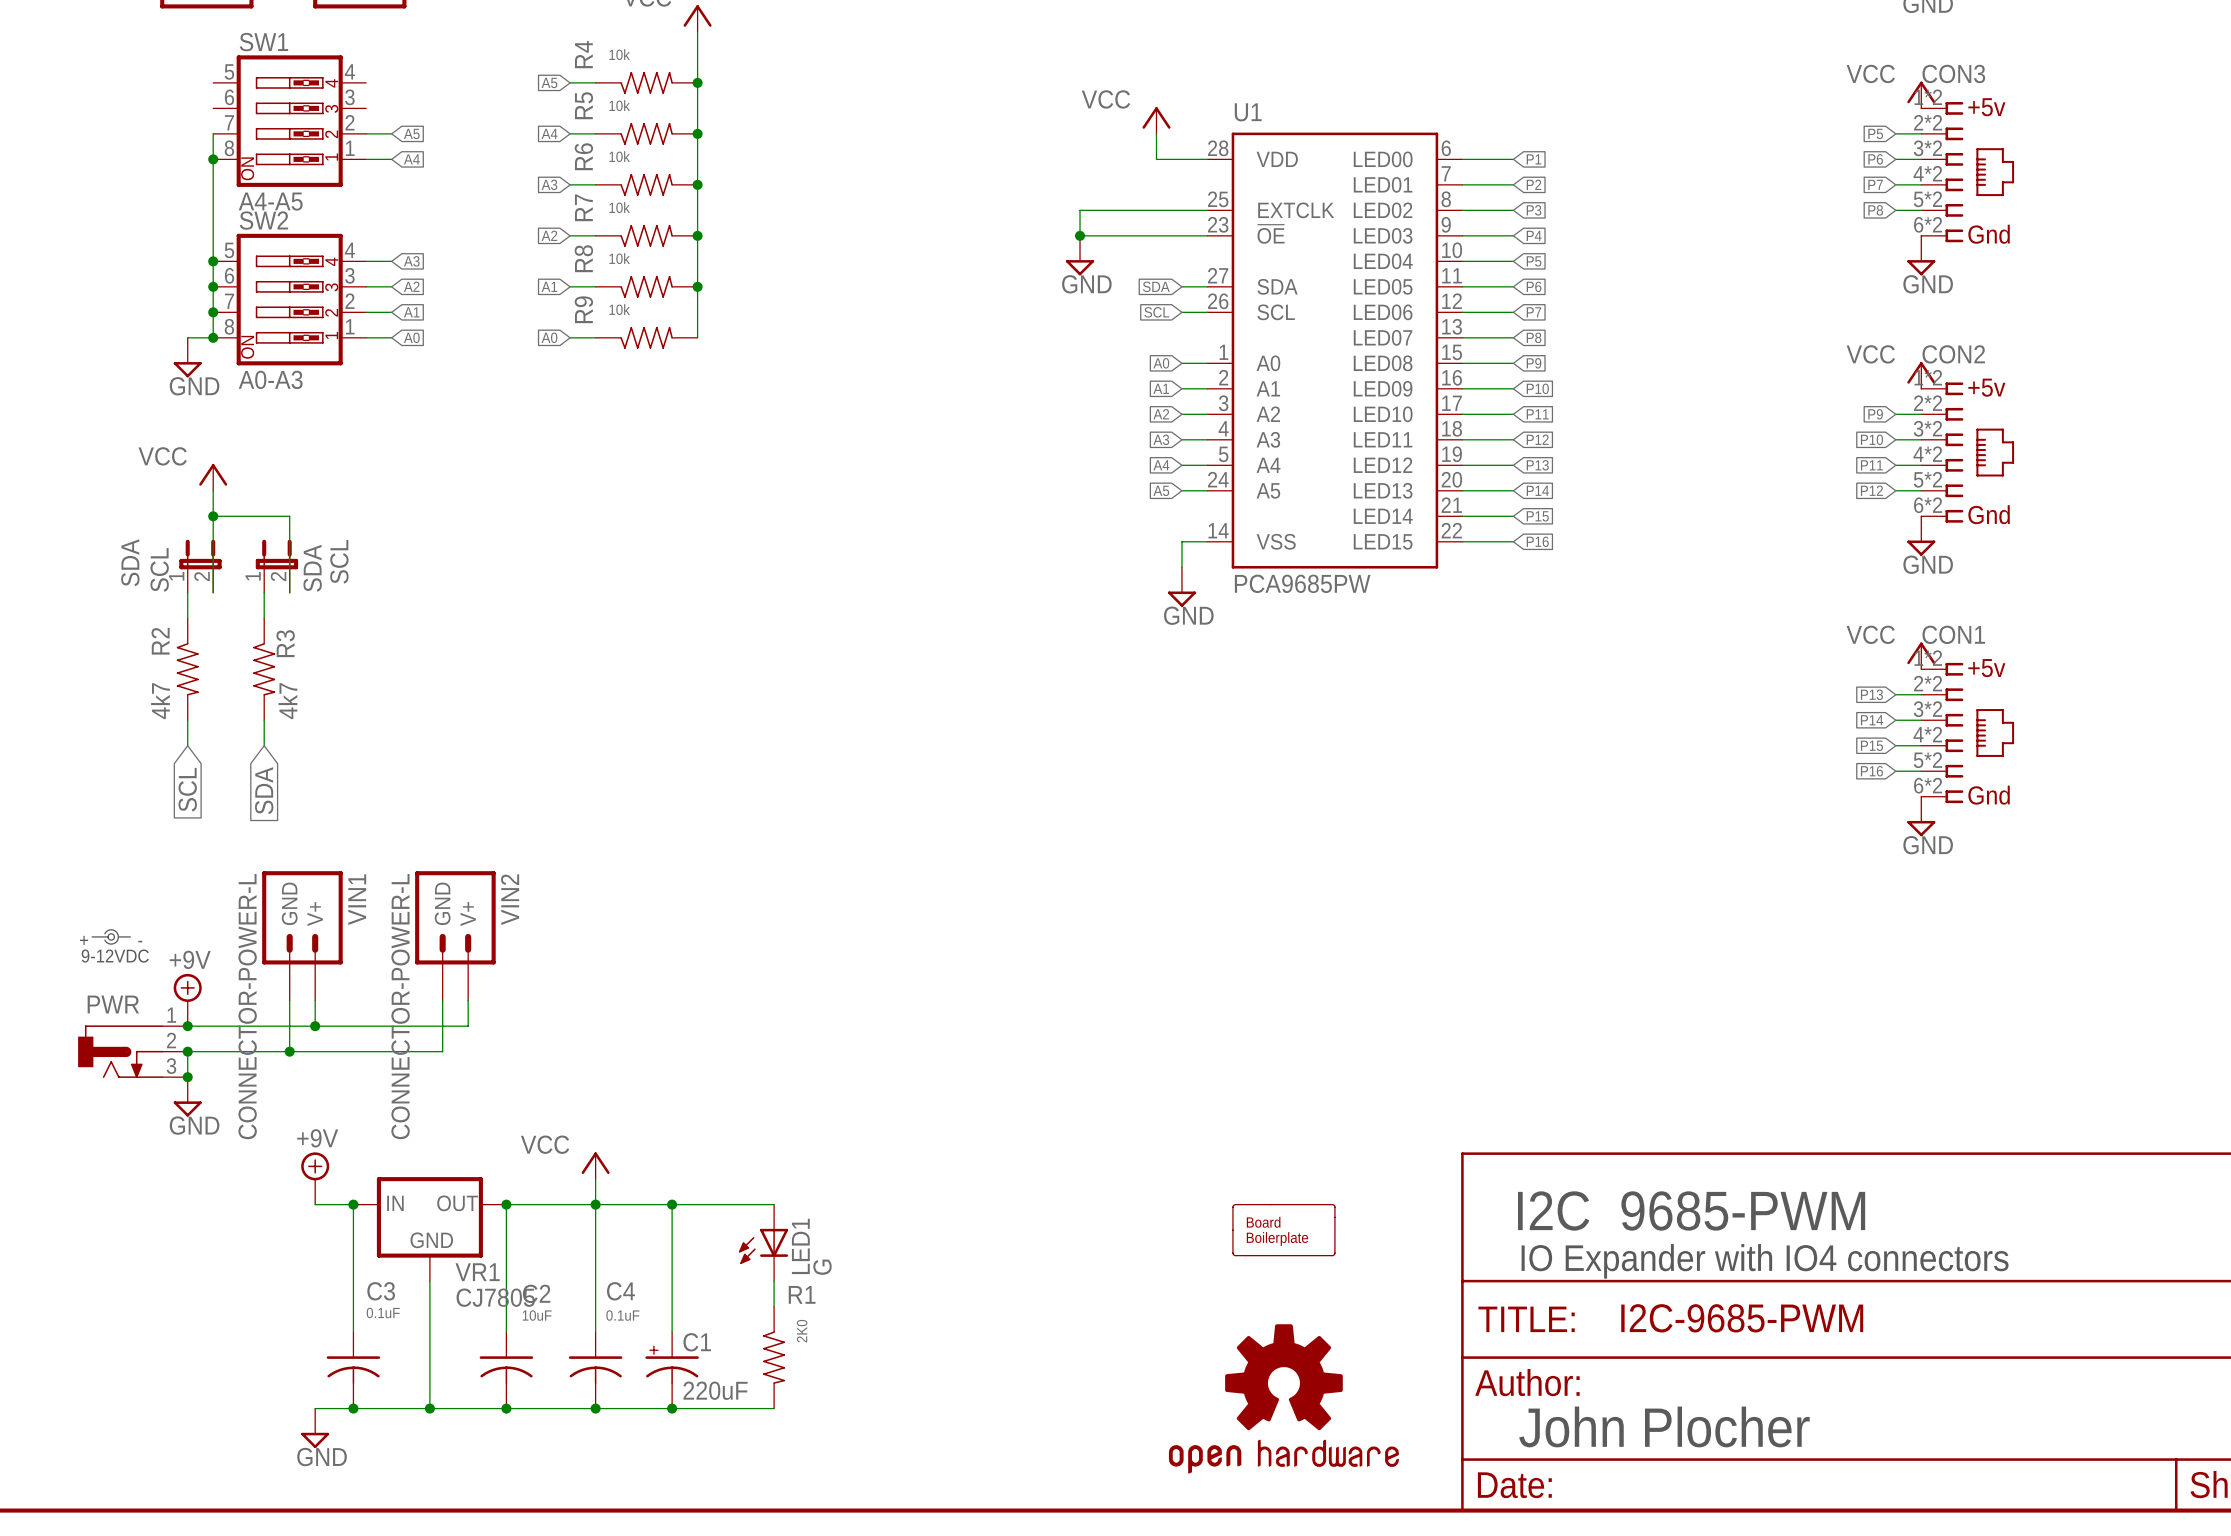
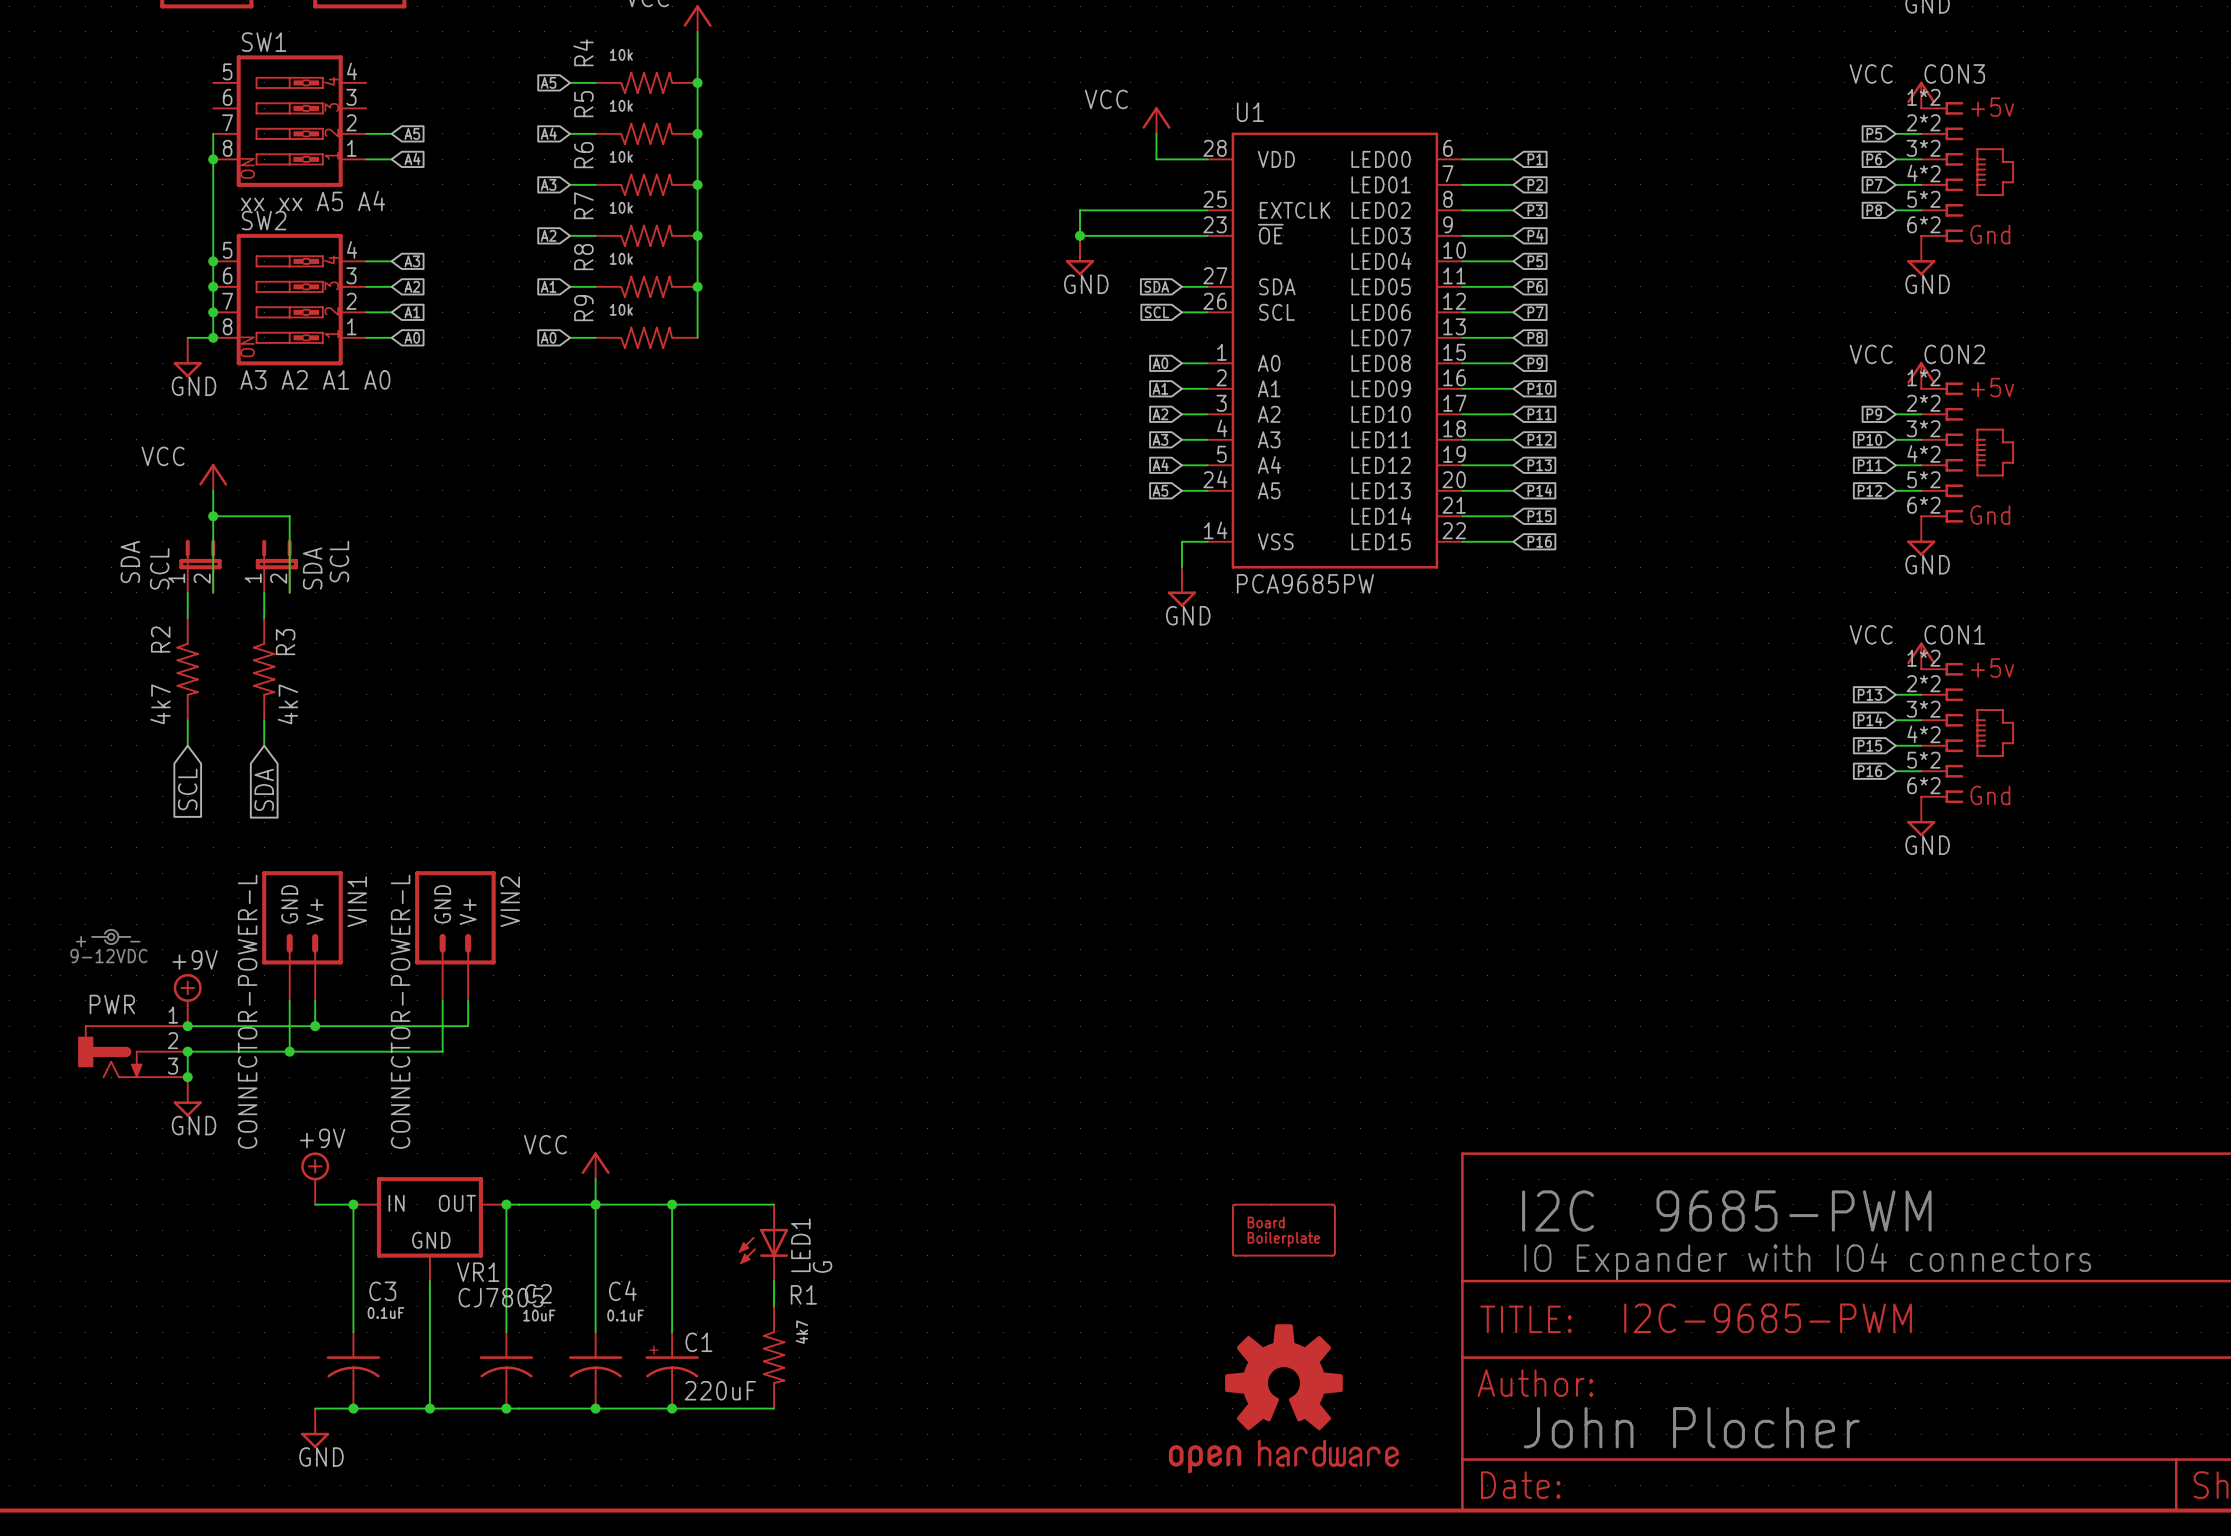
SW1 value: A4-A5 (270, 201) -> xx xx A5 A4 (313, 201)
SW2 value: A0-A3 (270, 379) -> A3 A2 A1 A0 (315, 379)
R1 value: 2K0 (802, 1331) -> 4k7 (801, 1332)

